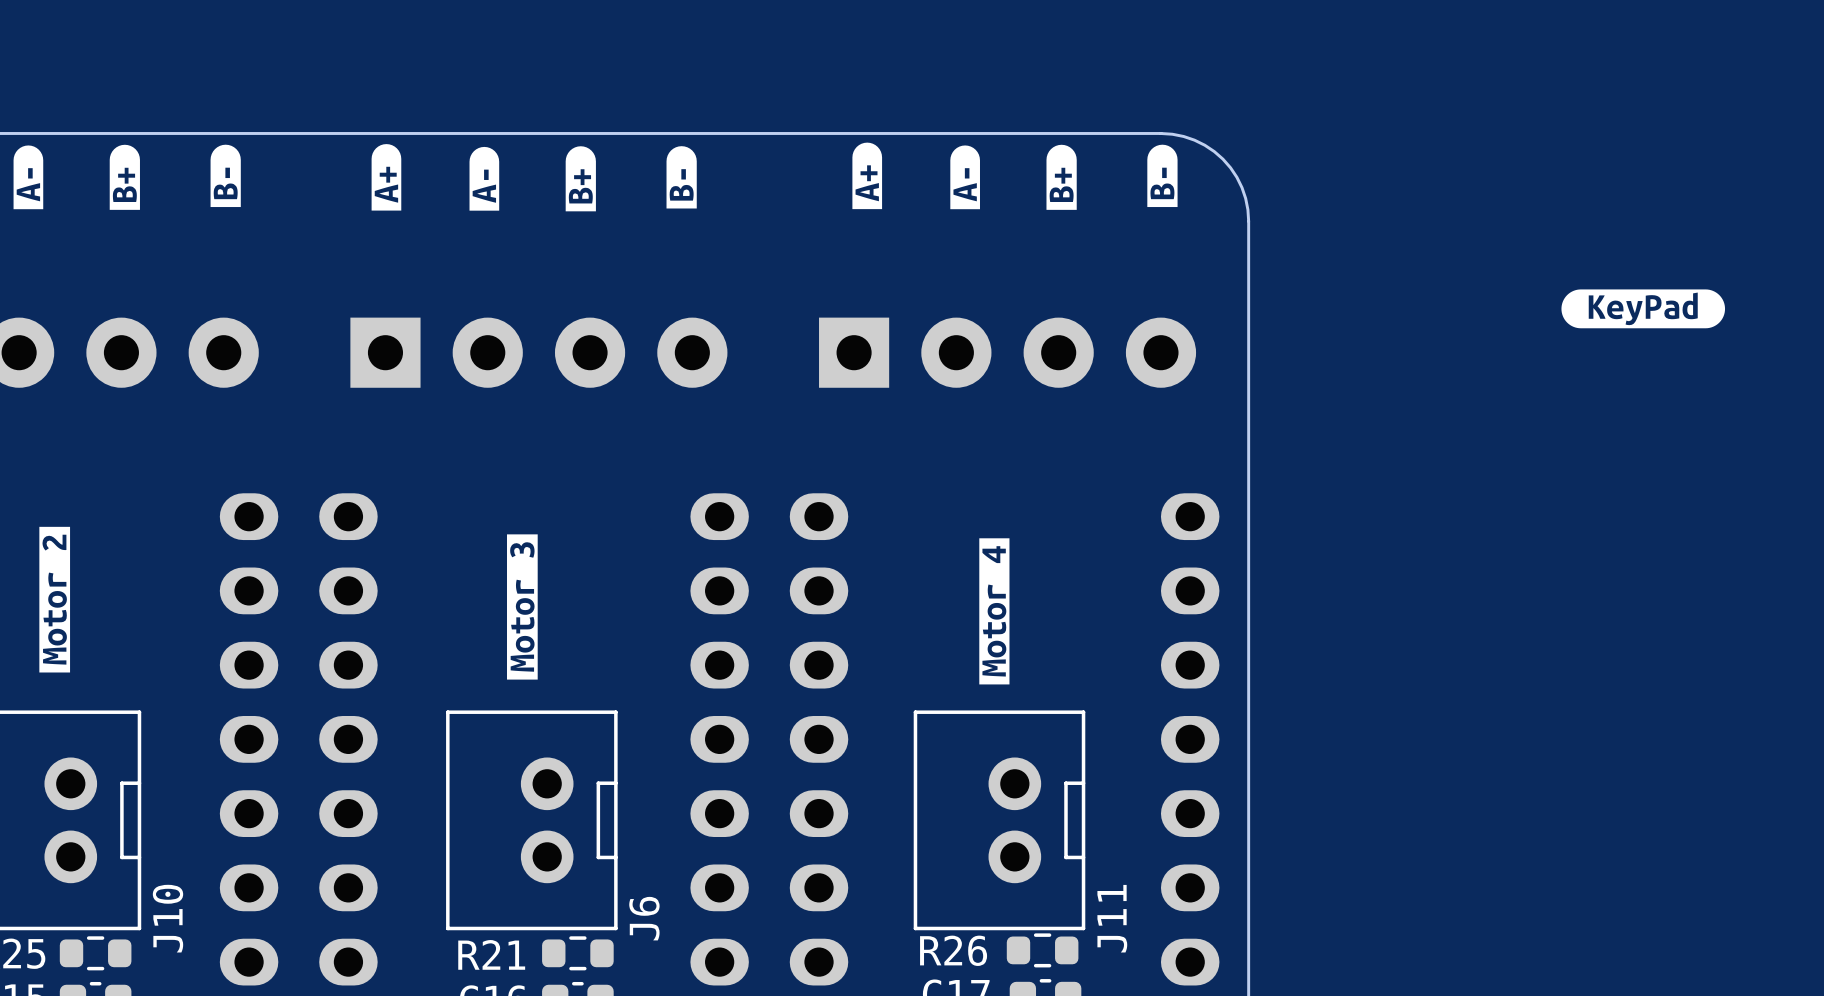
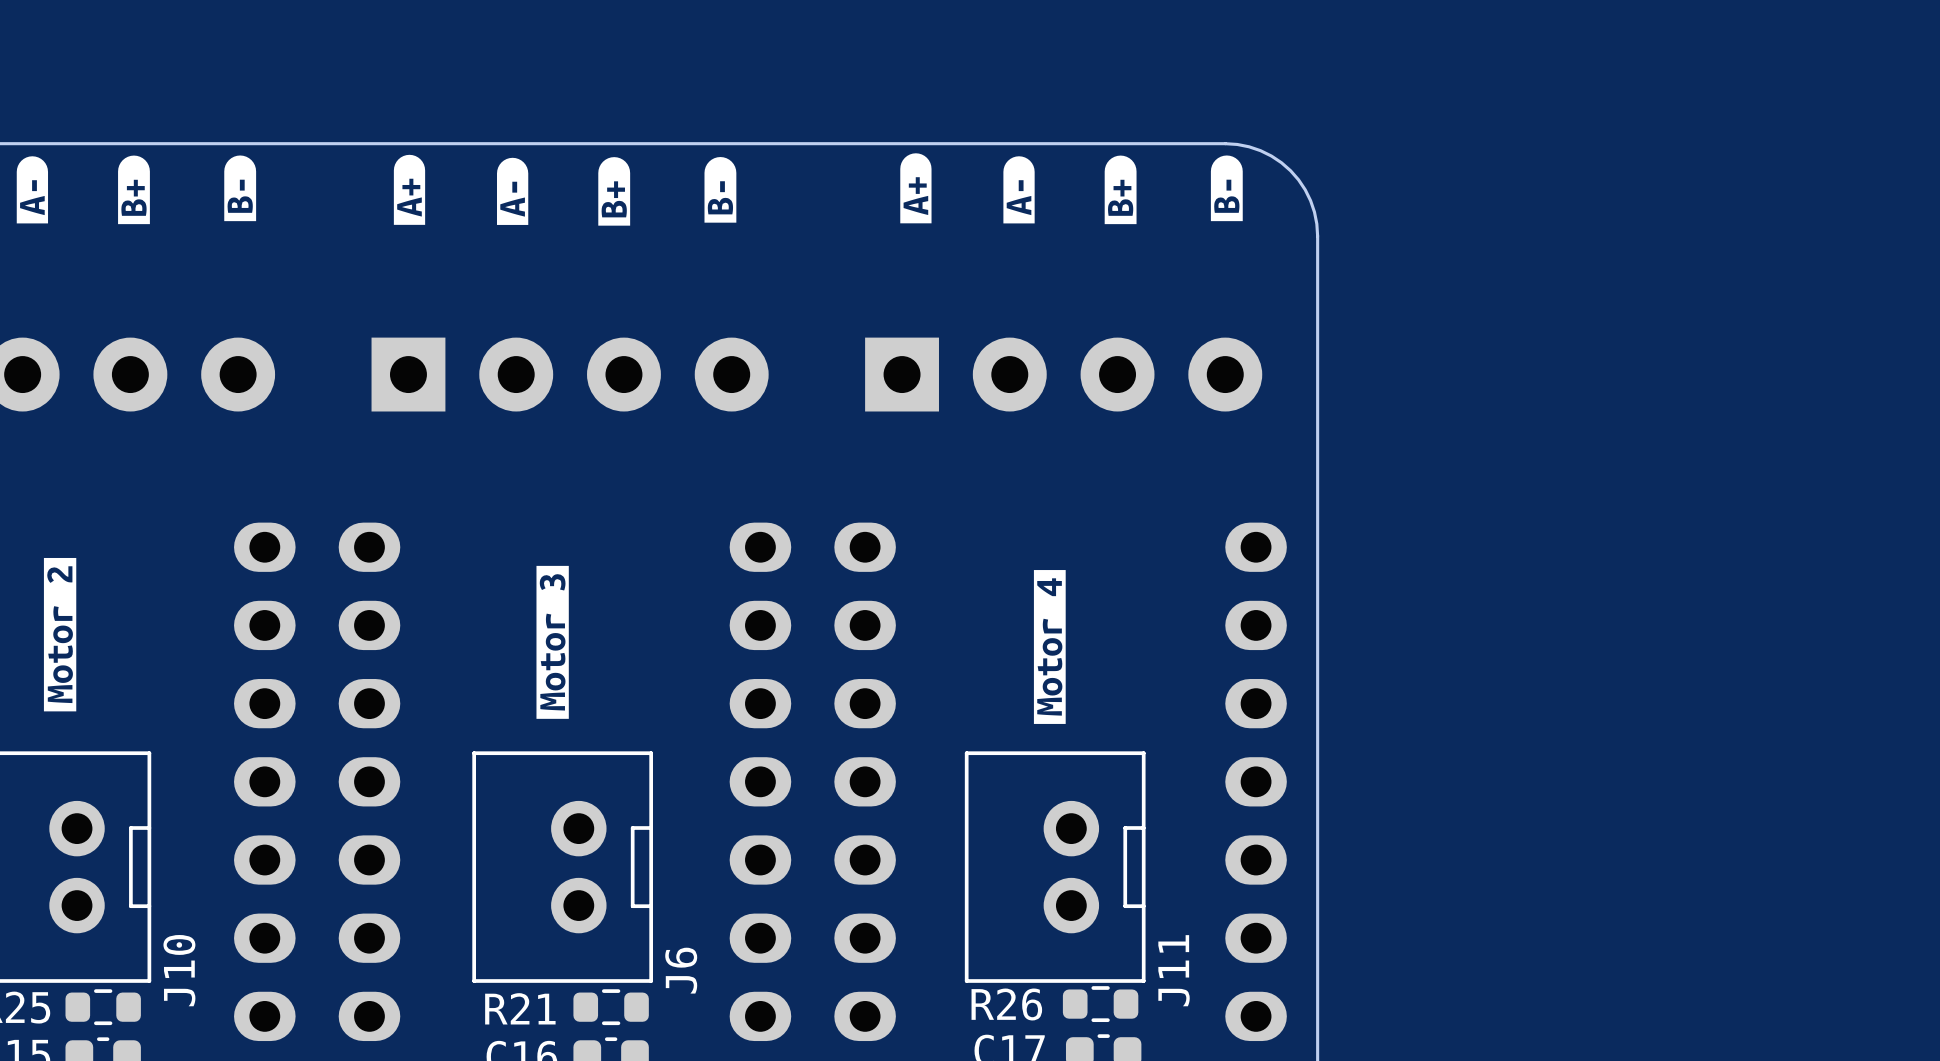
drawing: [1561, 289, 1726, 329] -> none

